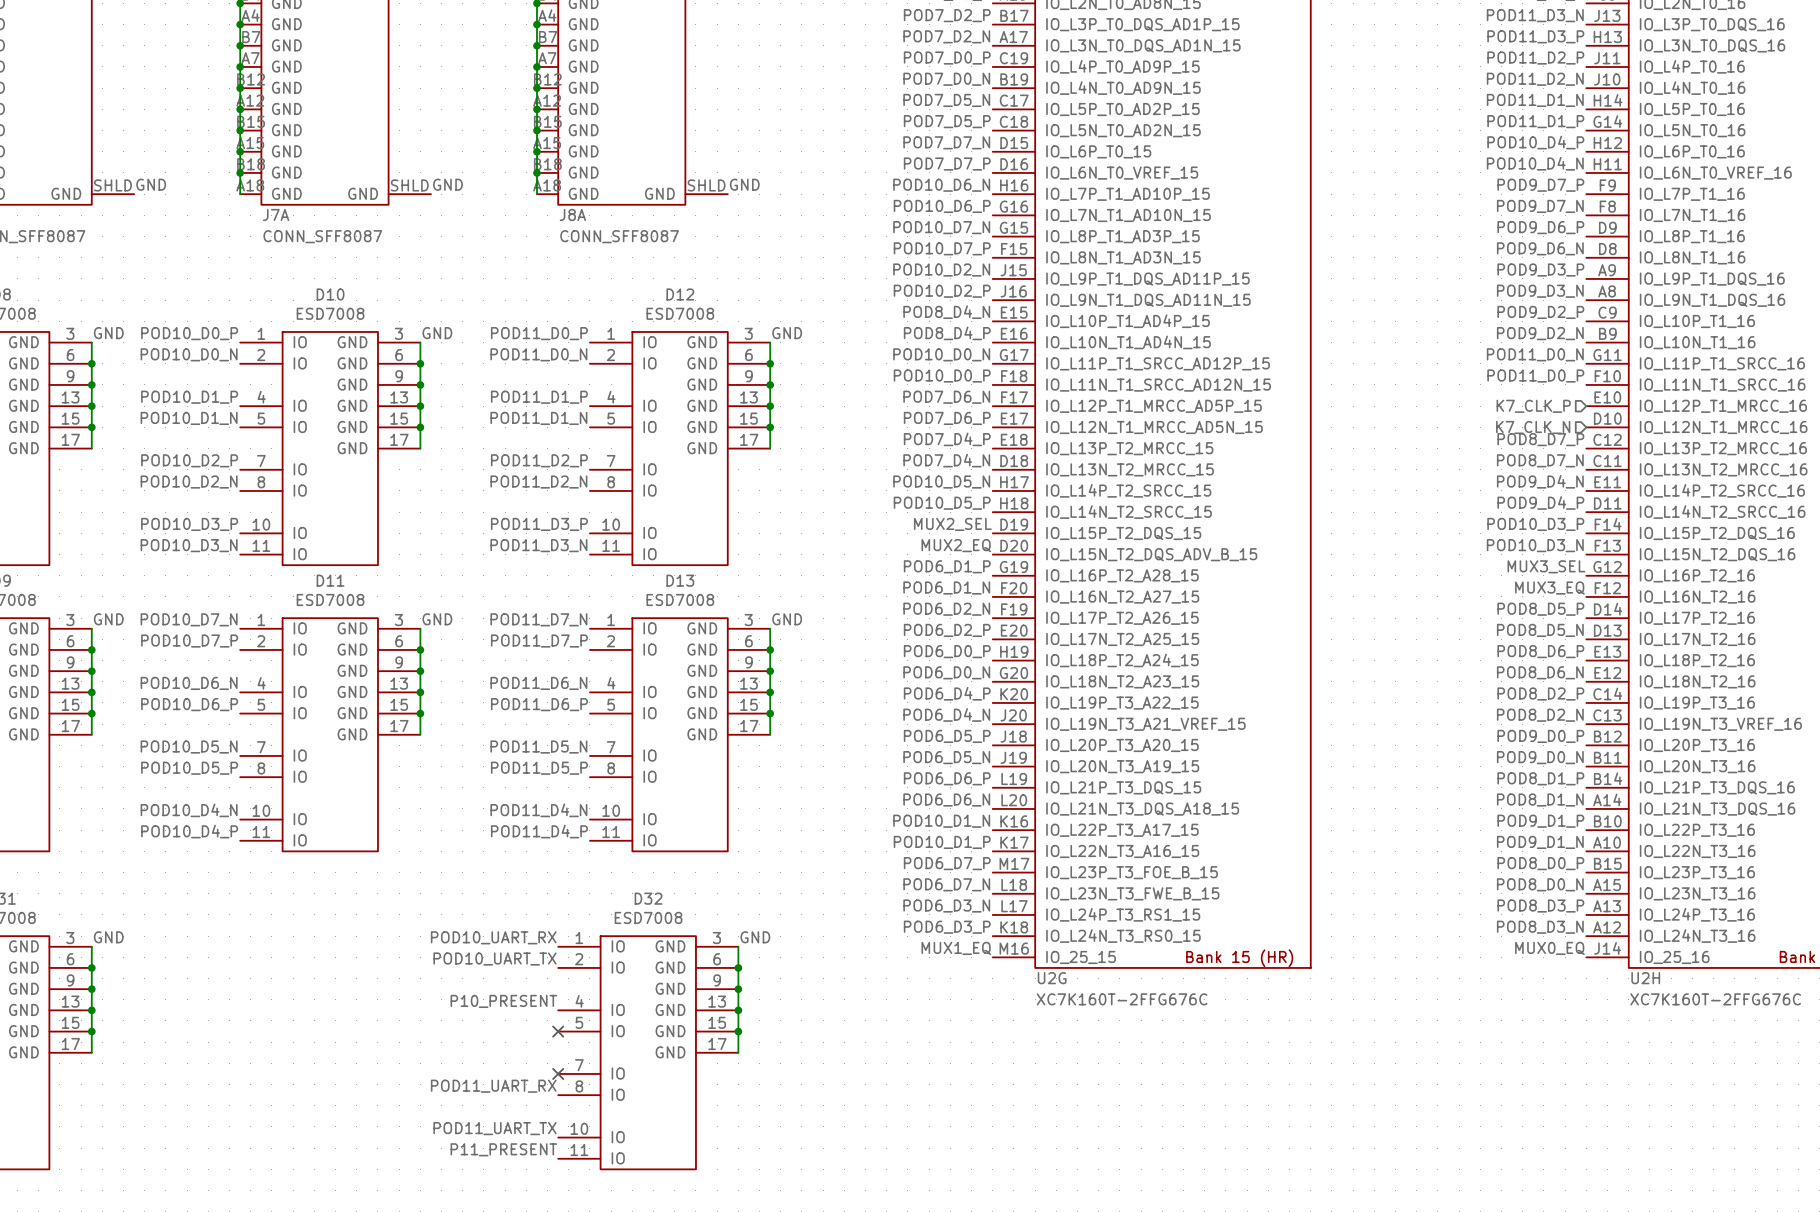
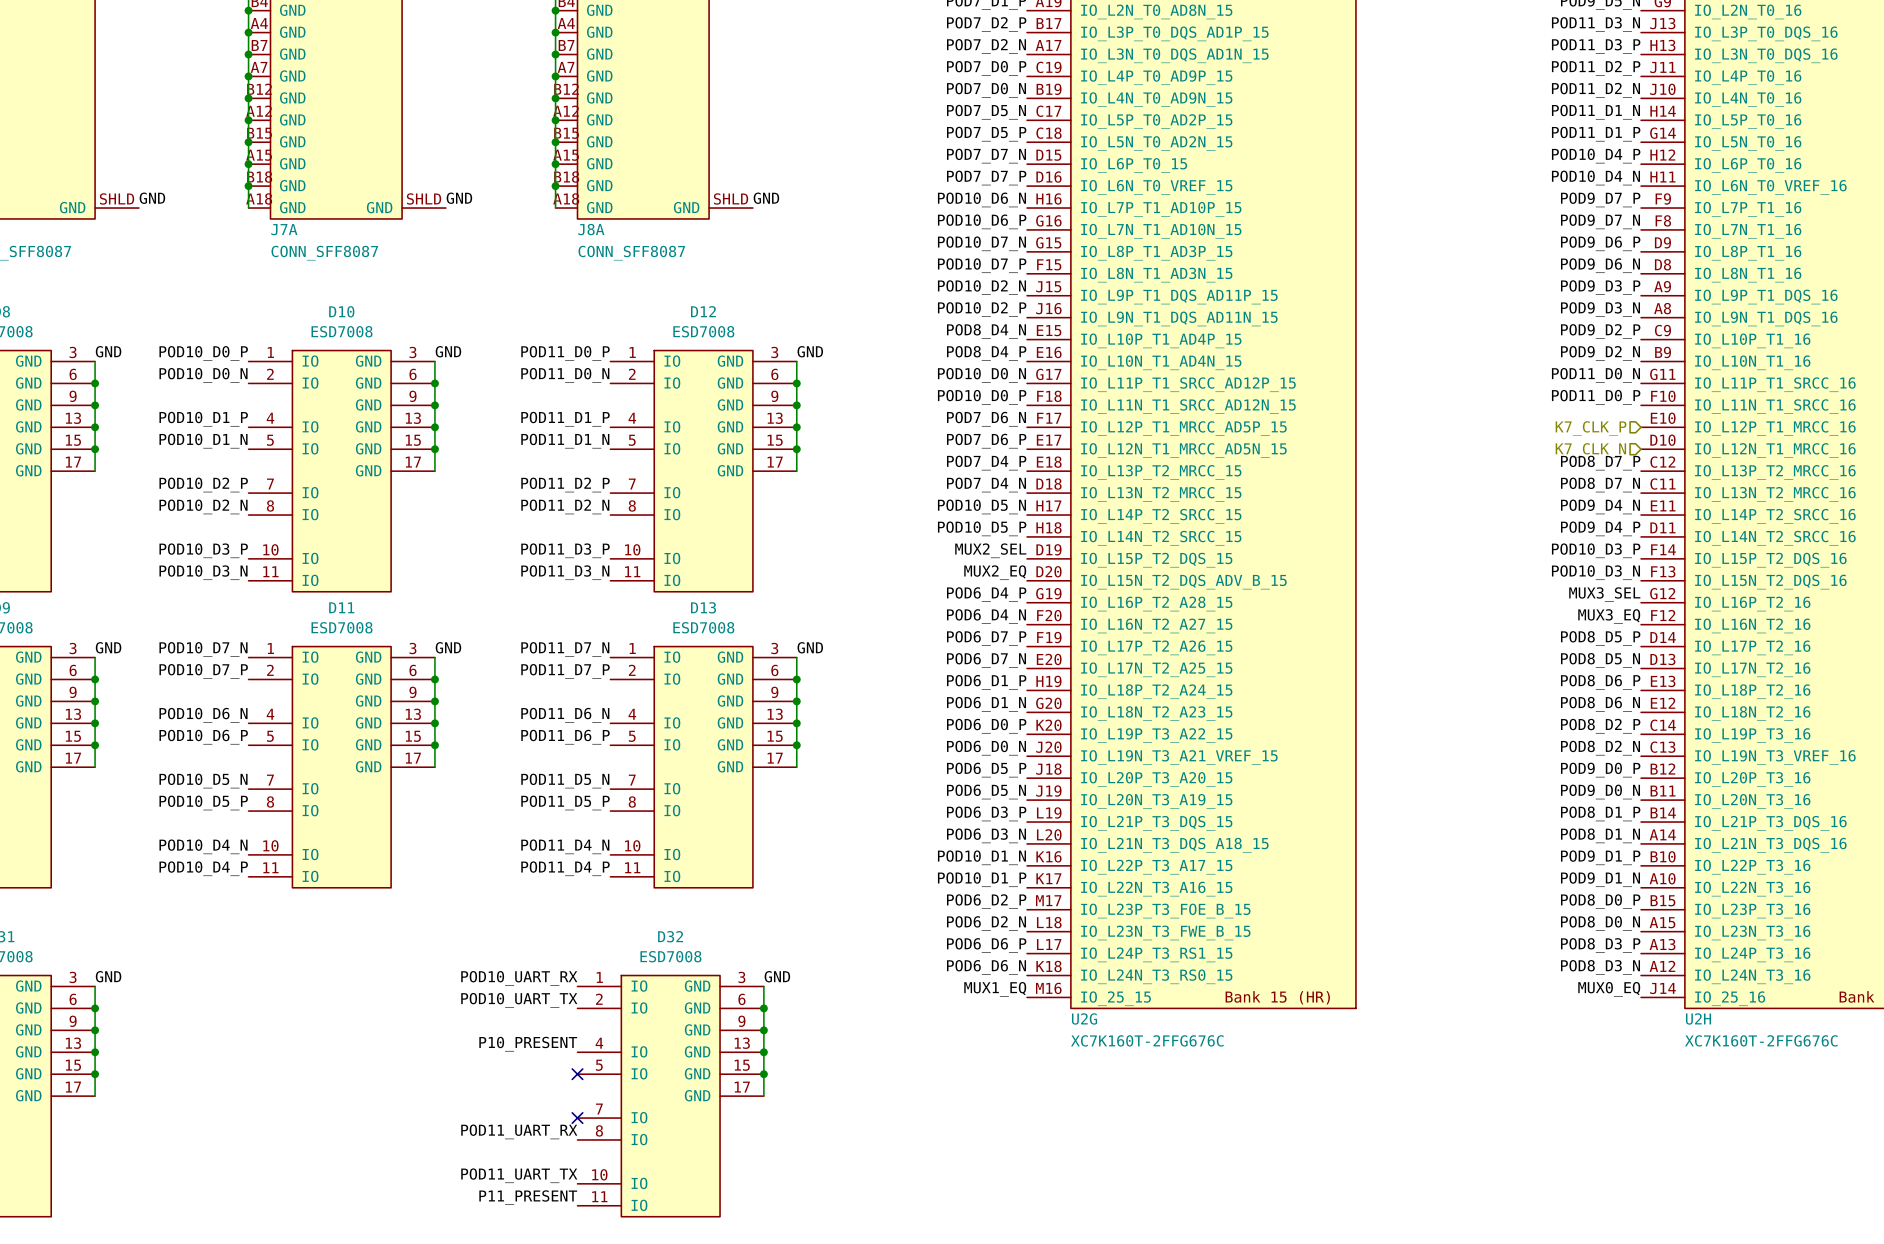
label: POD6_D1_P (947, 566) -> POD6_D4_P (986, 594)
label: POD6_D1_N (946, 588) -> POD6_D4_N (986, 616)
label: POD6_D2_N (946, 609) -> POD6_D7_P (986, 638)
label: POD6_D2_P (947, 630) -> POD6_D7_N (986, 660)
label: POD6_D0_P (947, 651) -> POD6_D1_P (986, 682)
label: POD6_D0_N (946, 672) -> POD6_D1_N (986, 704)
label: POD6_D4_P (947, 693) -> POD6_D0_P (986, 726)
label: POD6_D4_N (946, 714) -> POD6_D0_N (986, 748)
label: POD6_D6_P (947, 778) -> POD6_D3_P (986, 813)
label: POD6_D6_N (946, 800) -> POD6_D3_N (986, 835)
label: POD6_D7_P (947, 863) -> POD6_D2_P (986, 901)
label: POD6_D7_N (946, 884) -> POD6_D2_N (986, 923)
label: POD6_D3_N (946, 906) -> POD6_D6_P (986, 945)
label: POD6_D3_P (947, 927) -> POD6_D6_N (986, 967)

